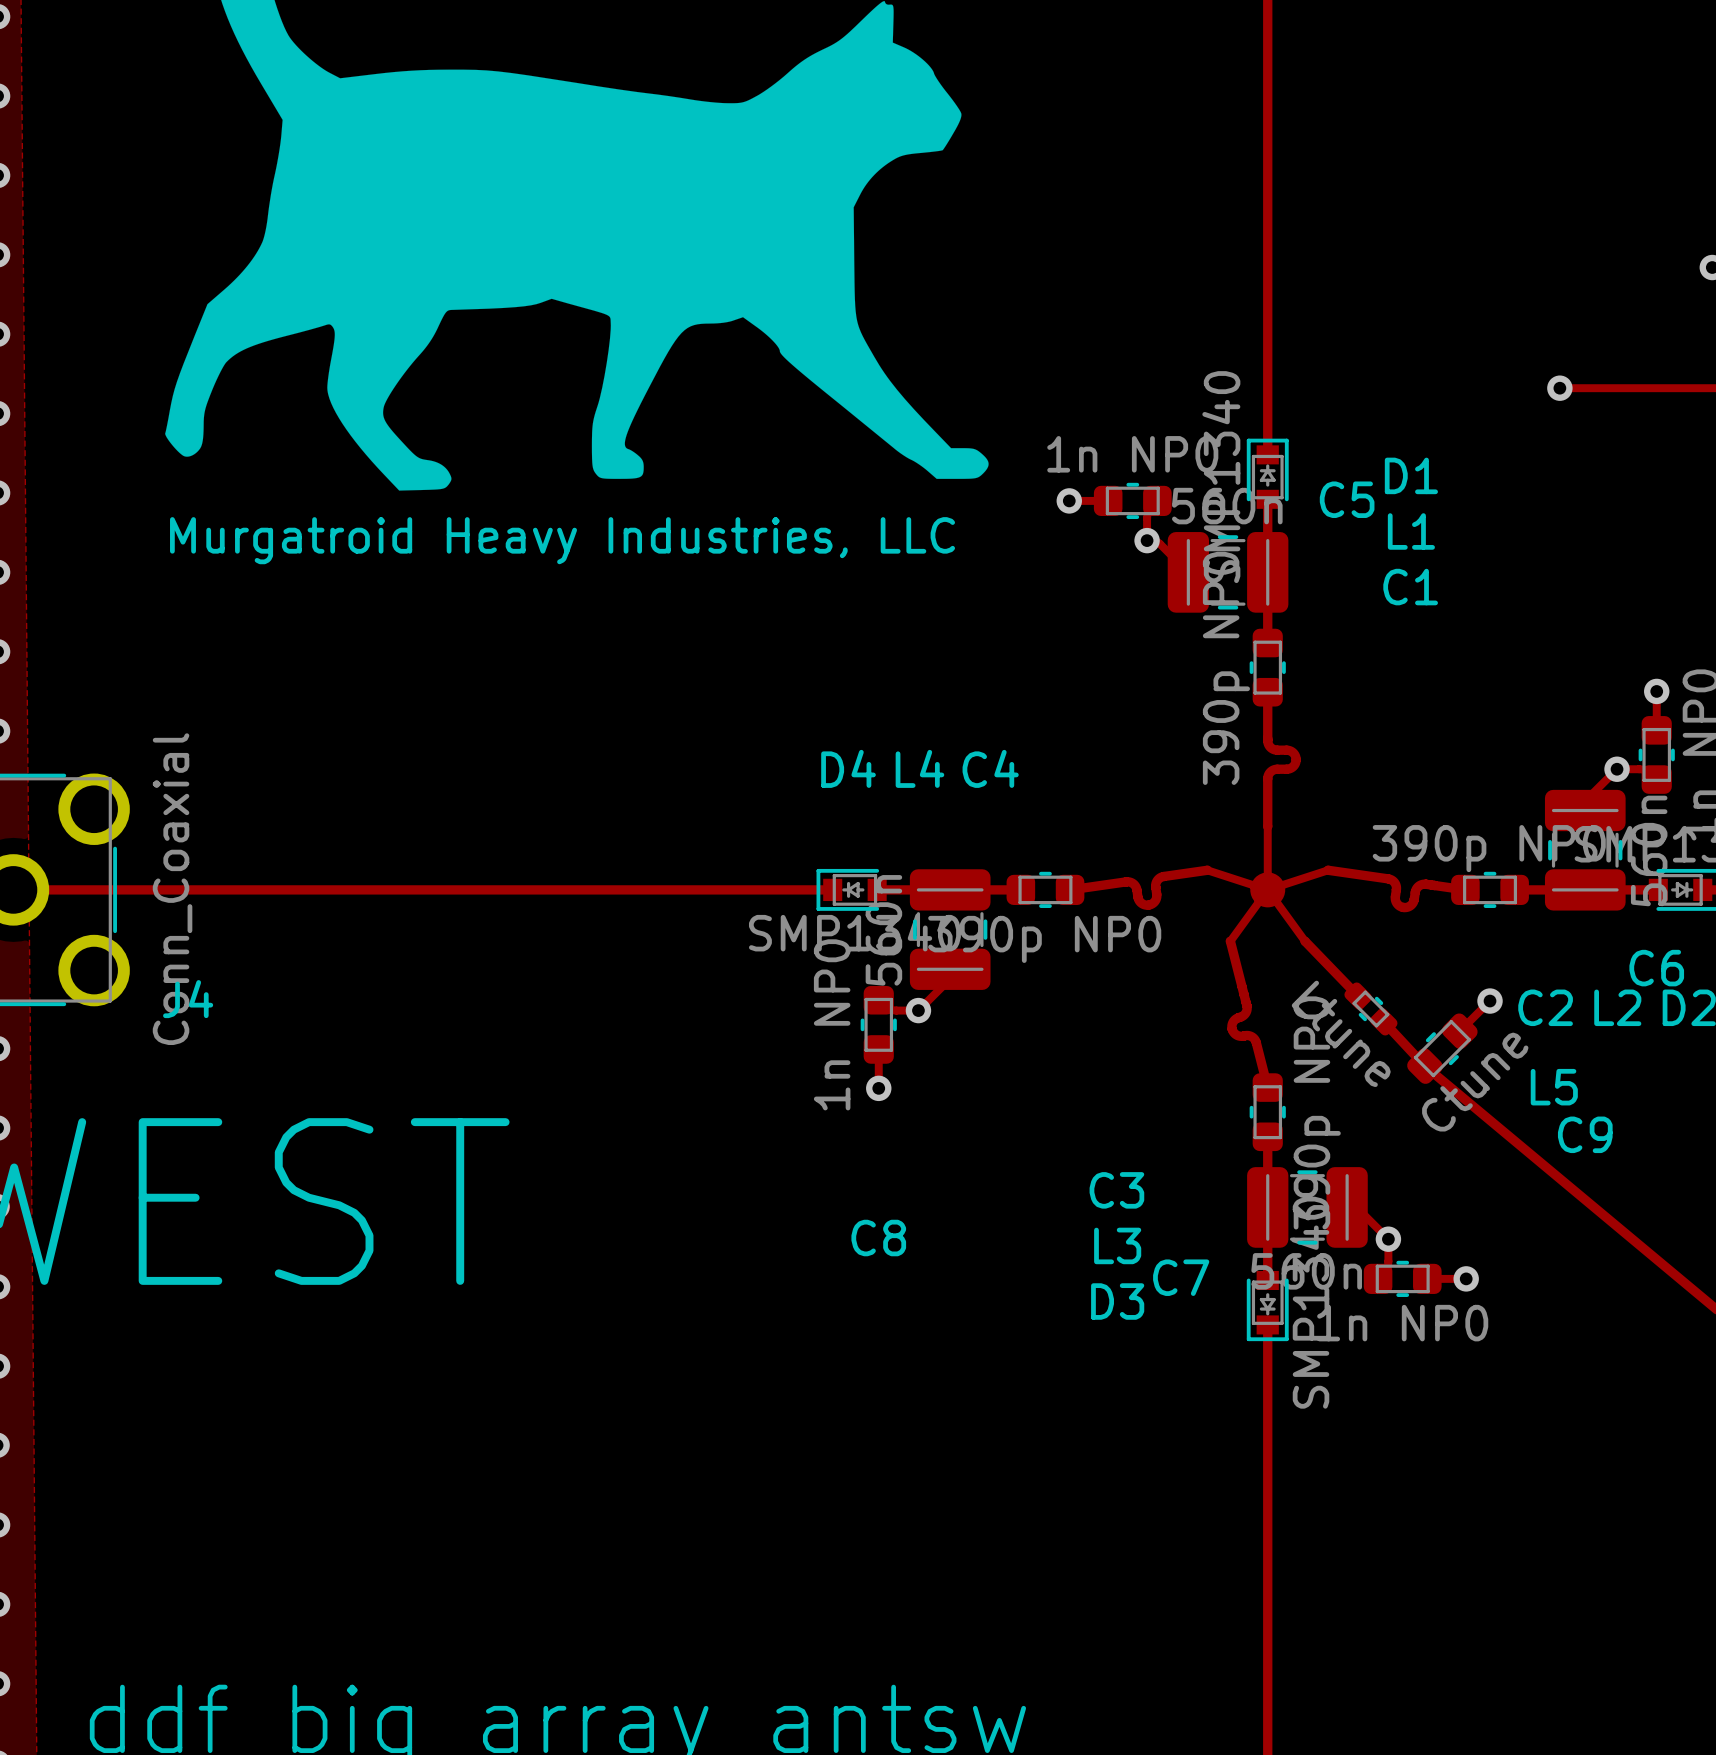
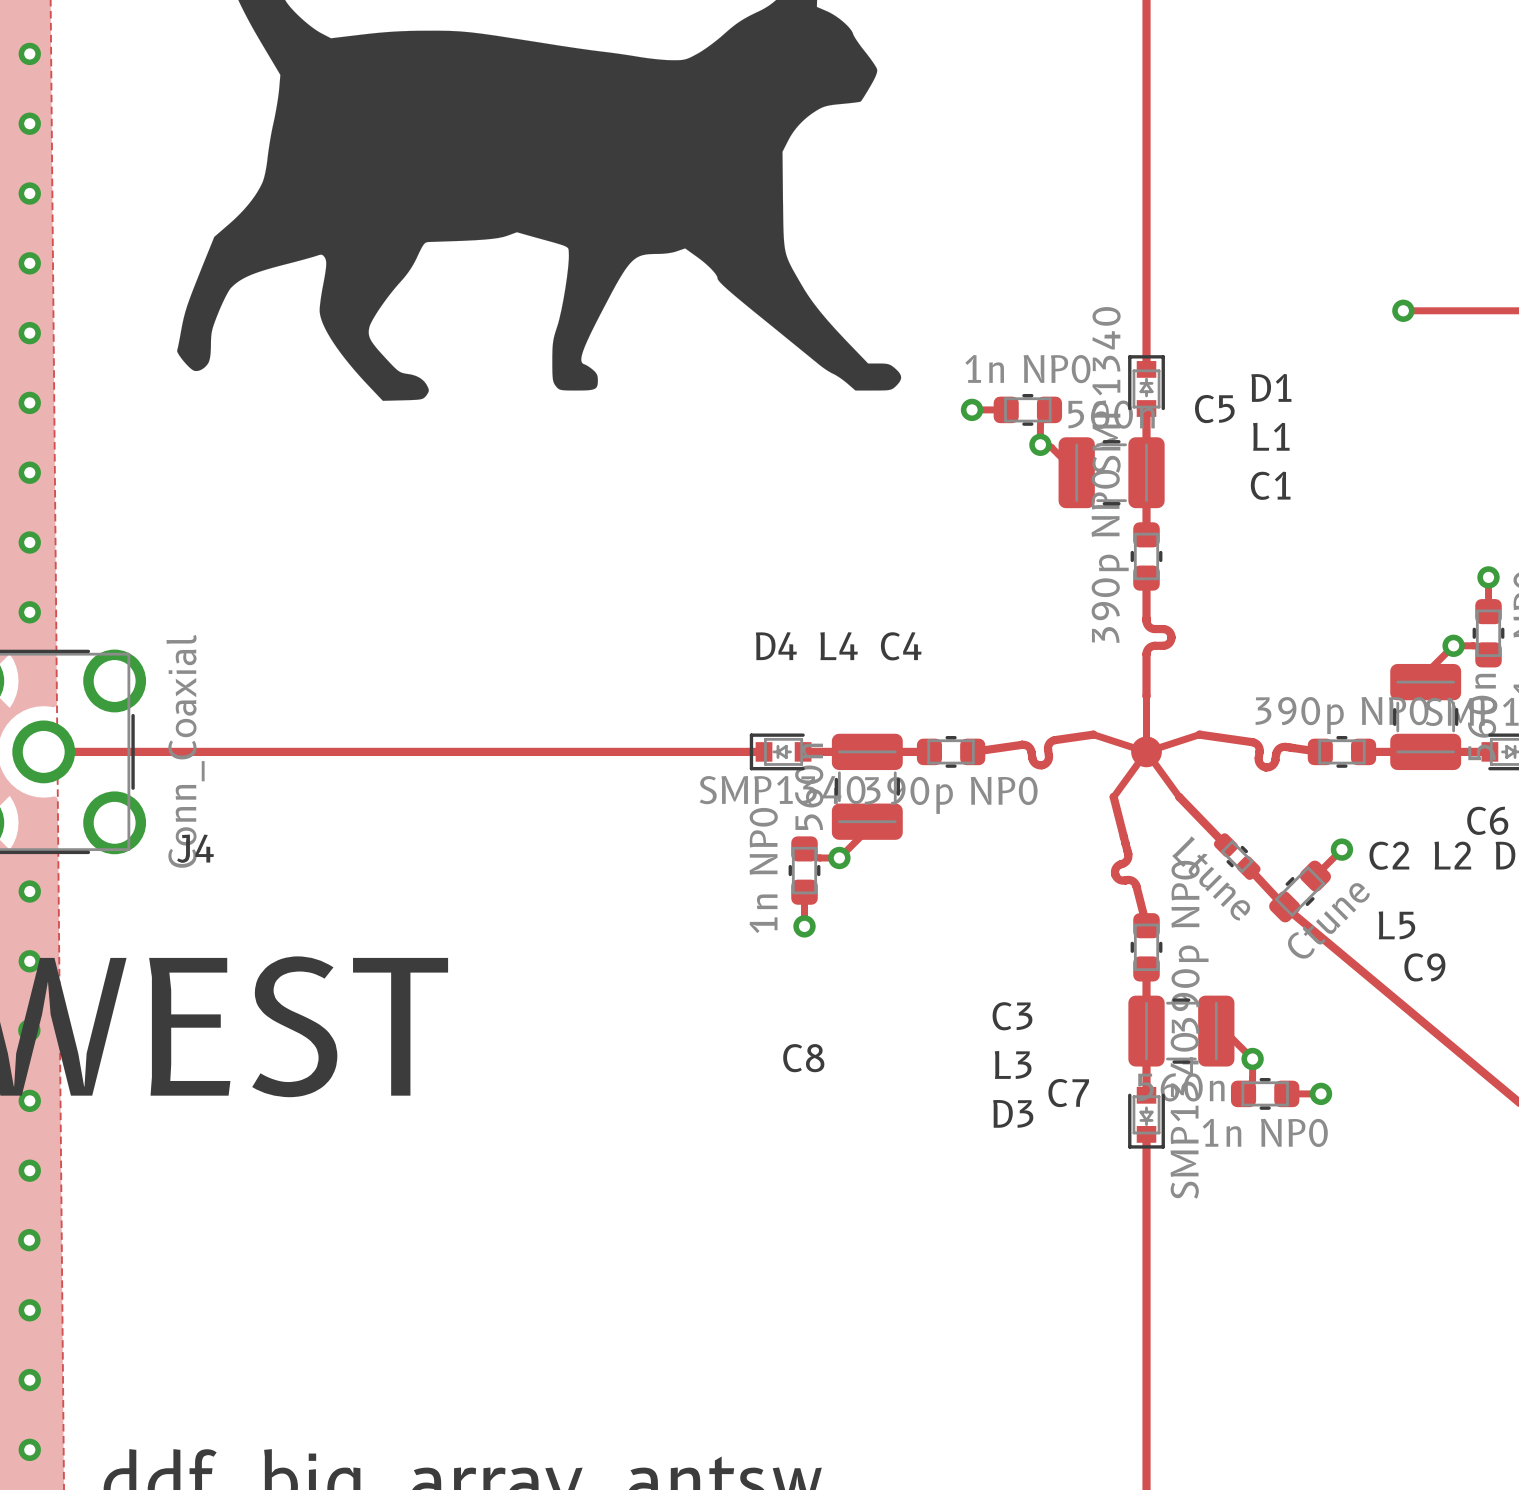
text: Murgatroid Heavy Industries, LLC (562, 540) -> none

